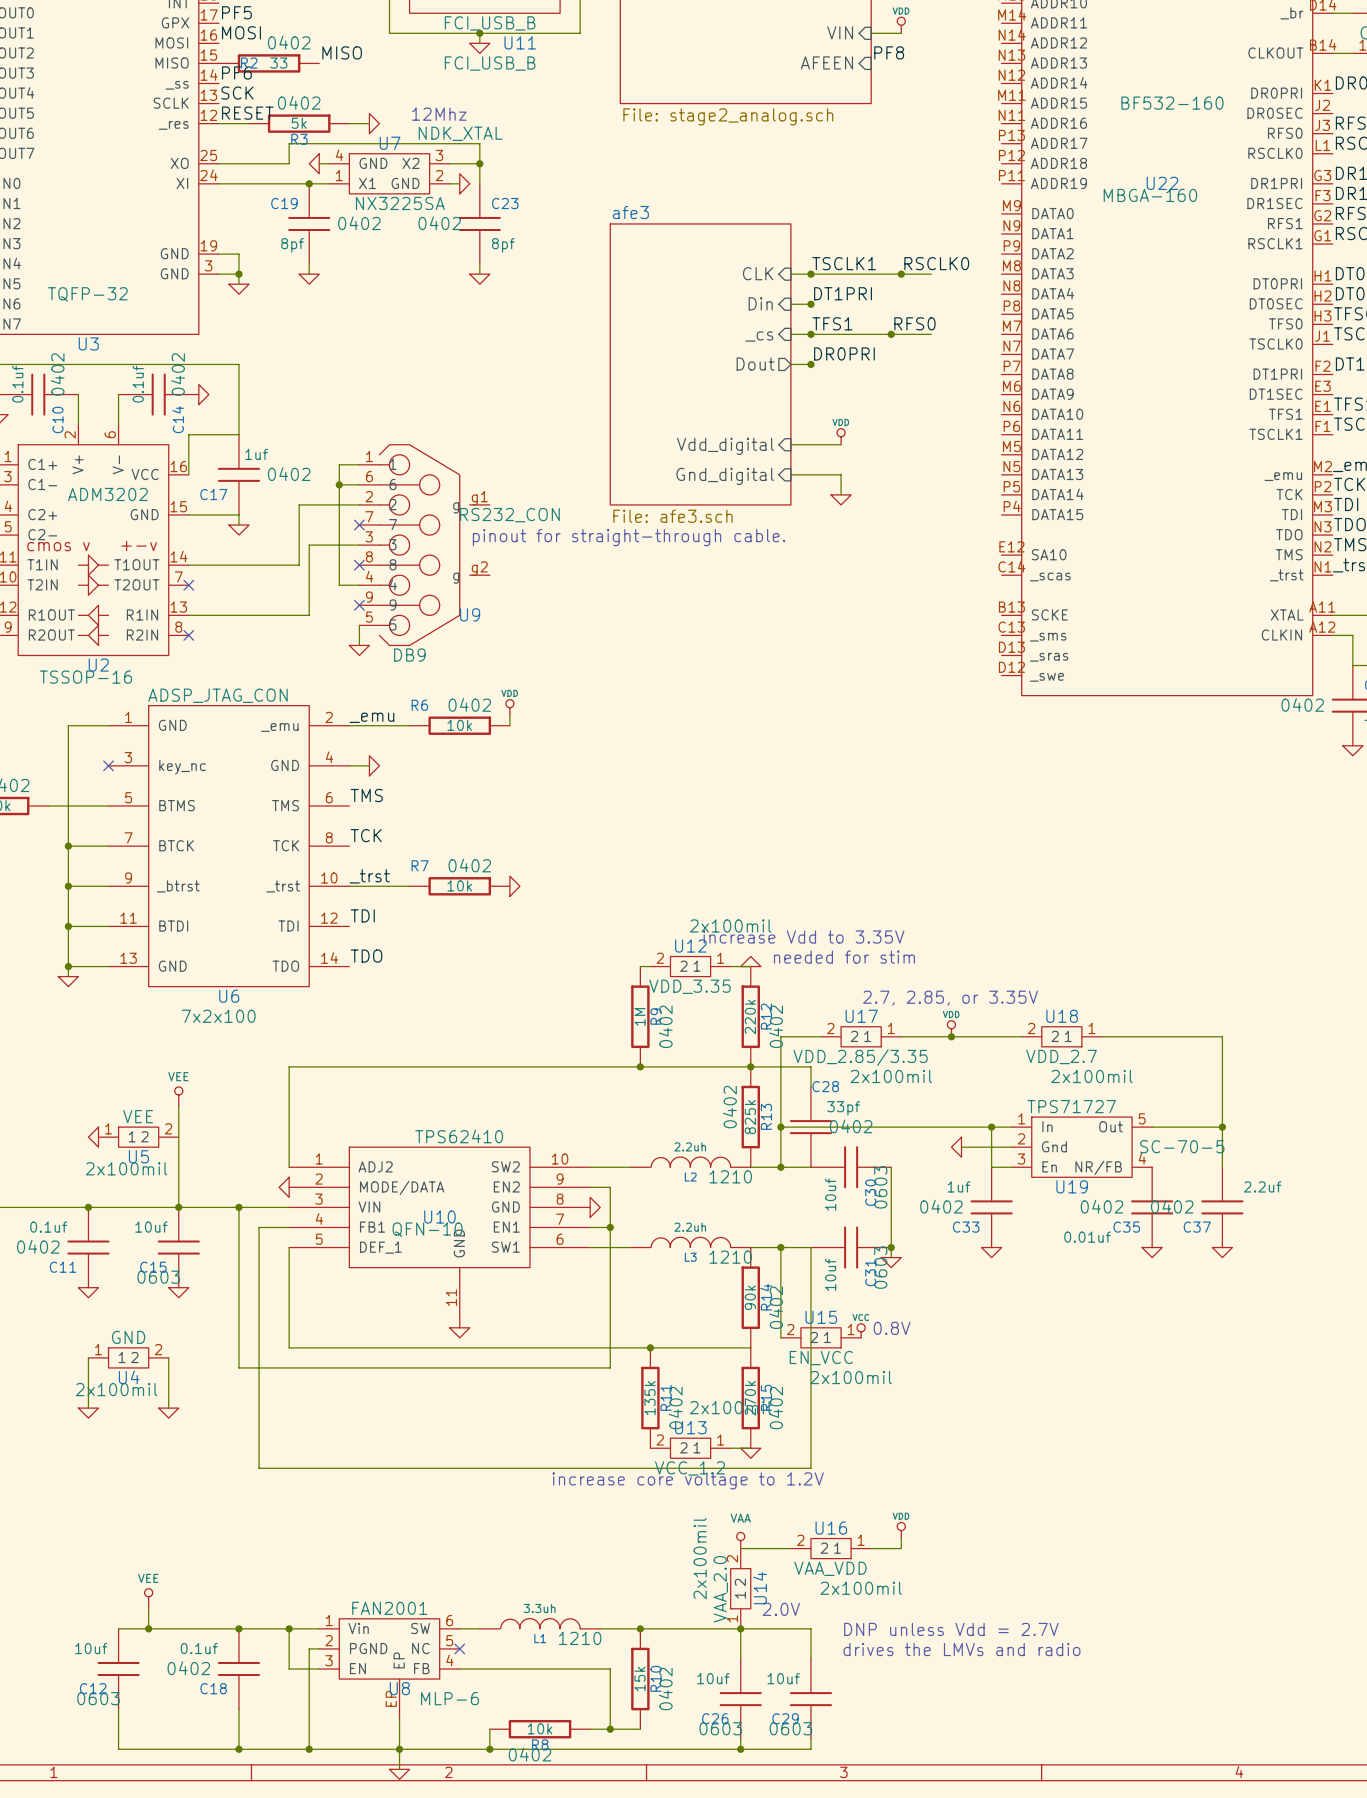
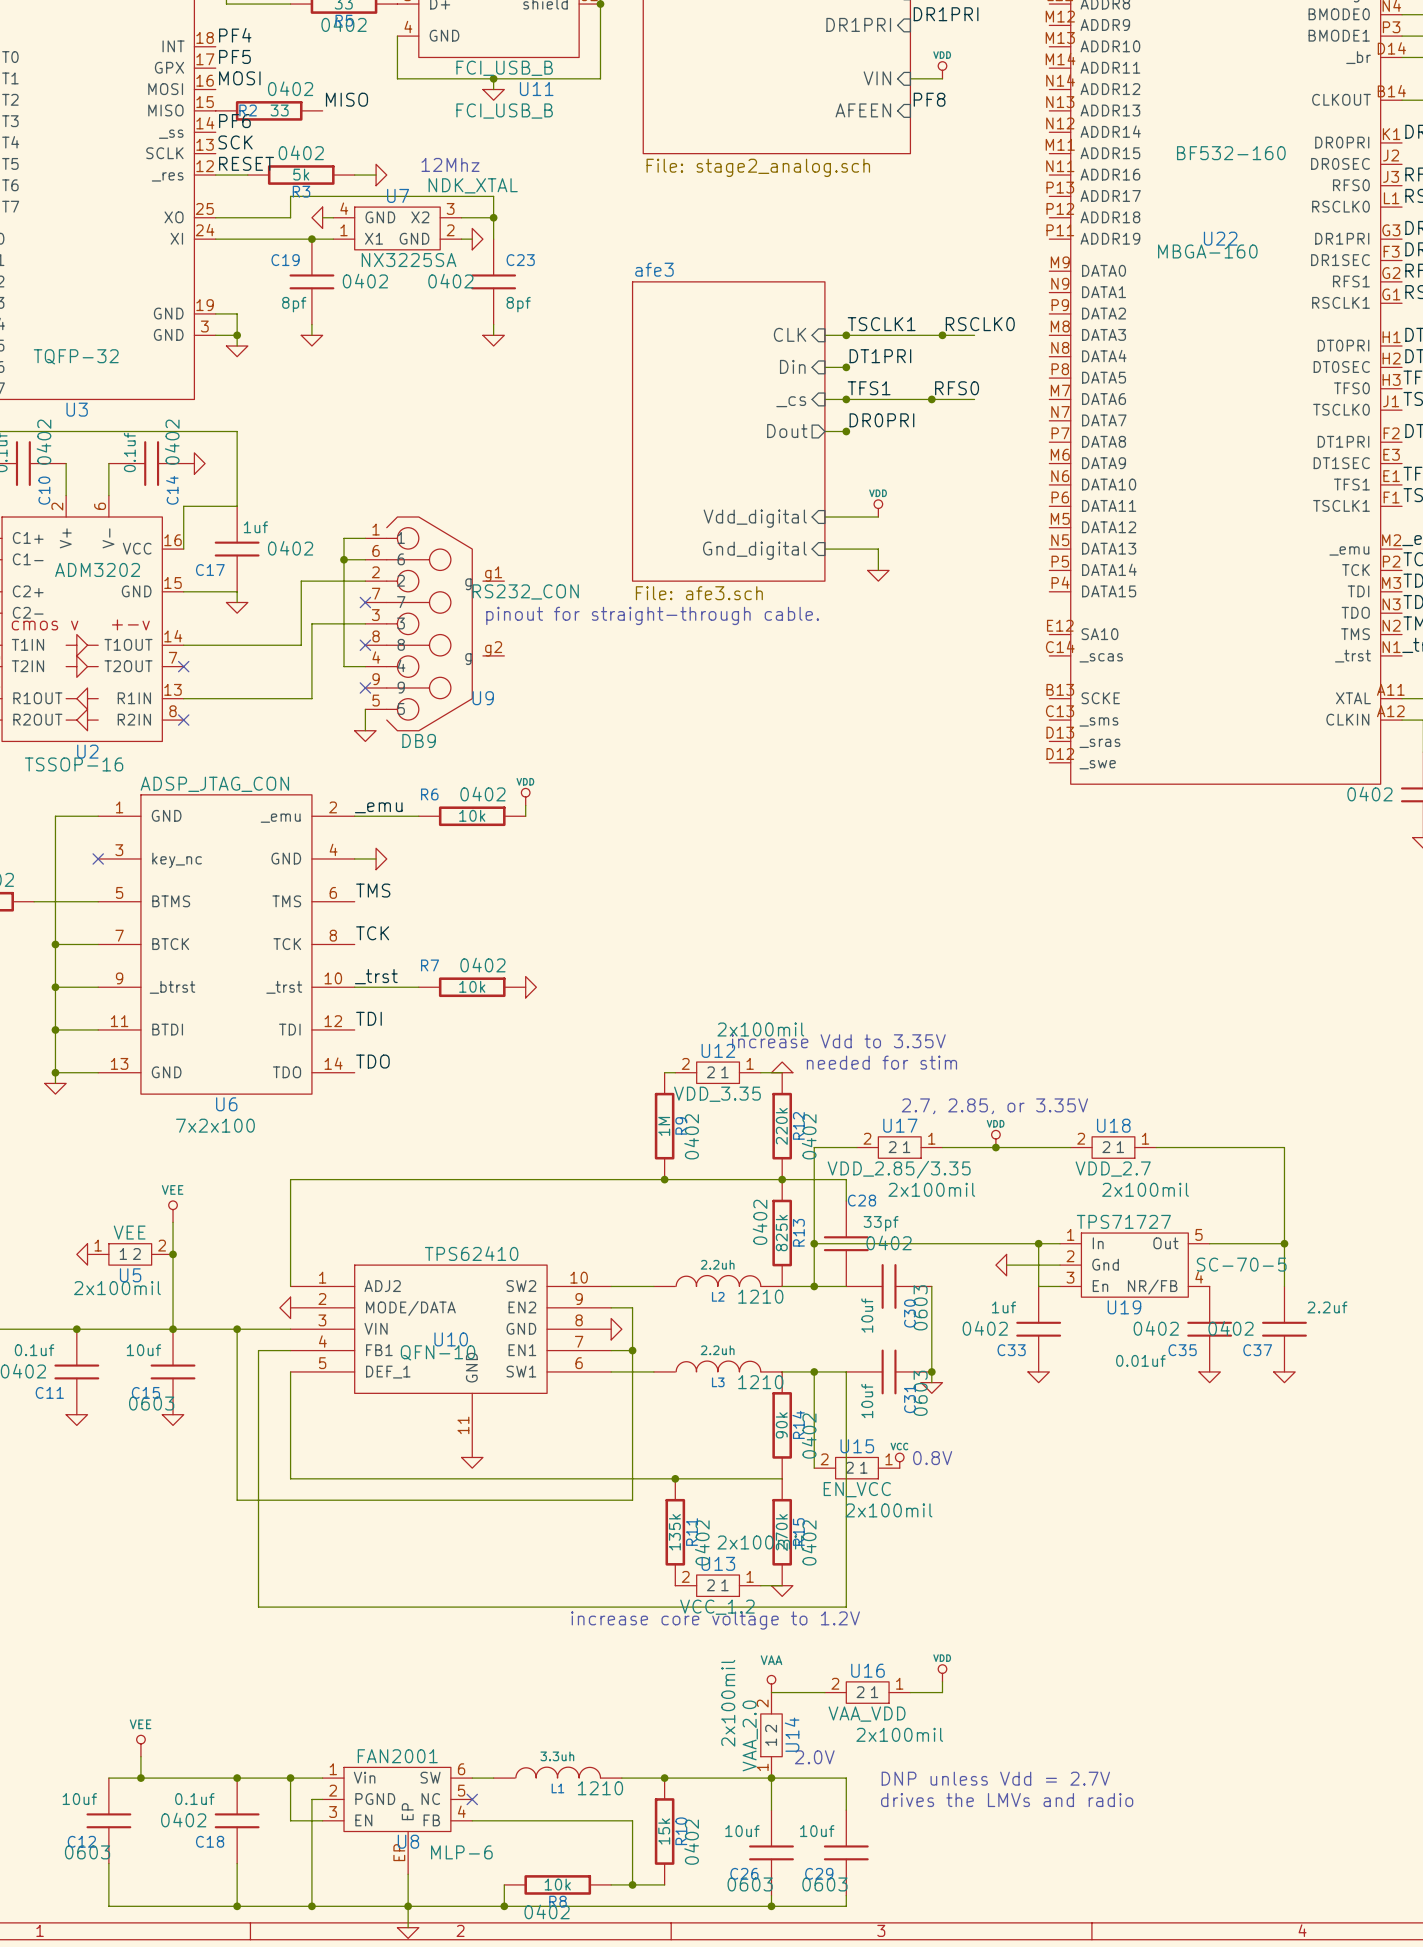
junction: none -> (173, 1254)
wire: (88, 1357) (88, 1408) -> none
U4: GND (128, 1357) -> none
wire: (168, 1357) (168, 1408) -> none
power symbol: (88, 1413) -> none
power symbol: (168, 1413) -> none

